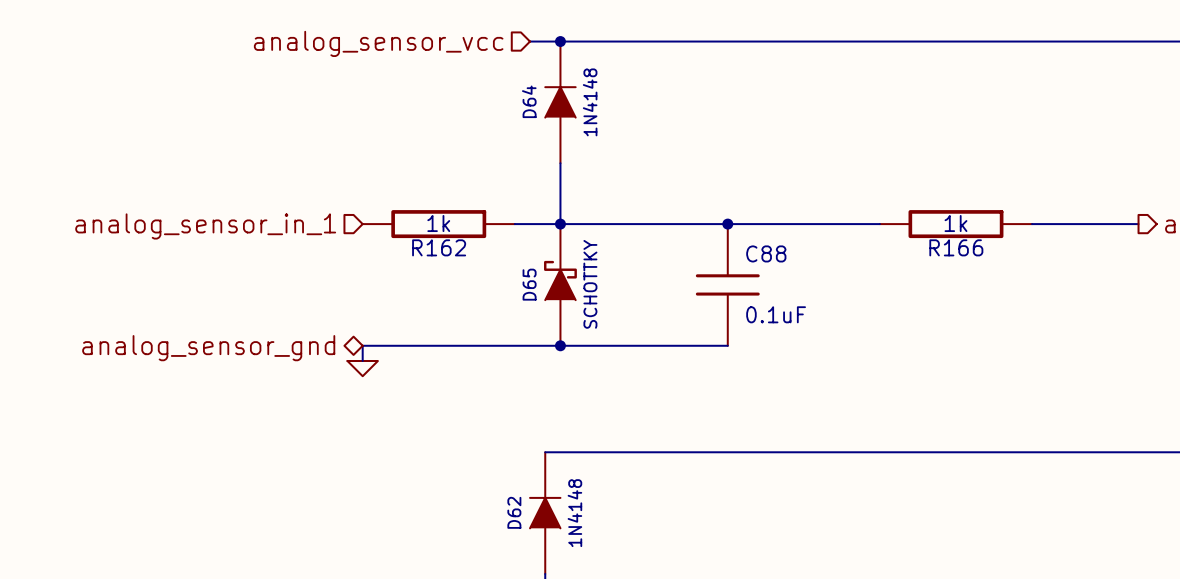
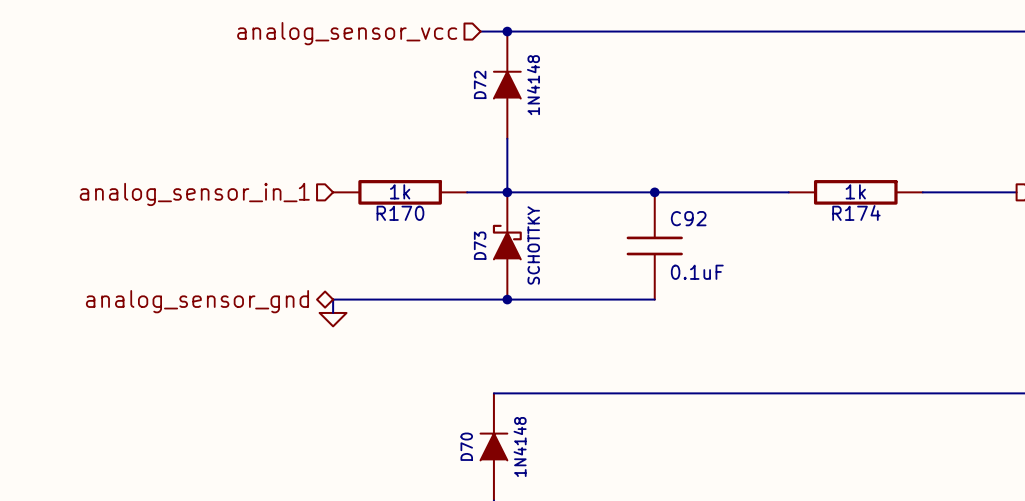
D64 name: D64 (529, 101) -> D72 (480, 84)
R162 name: R162 (439, 247) -> R170 (400, 213)
R166 name: R166 (956, 247) -> R174 (856, 212)
C88 name: C88 (766, 253) -> C92 (688, 218)
D65 name: D65 (529, 284) -> D73 (480, 245)
D62 name: D62 (514, 512) -> D70 (466, 446)

